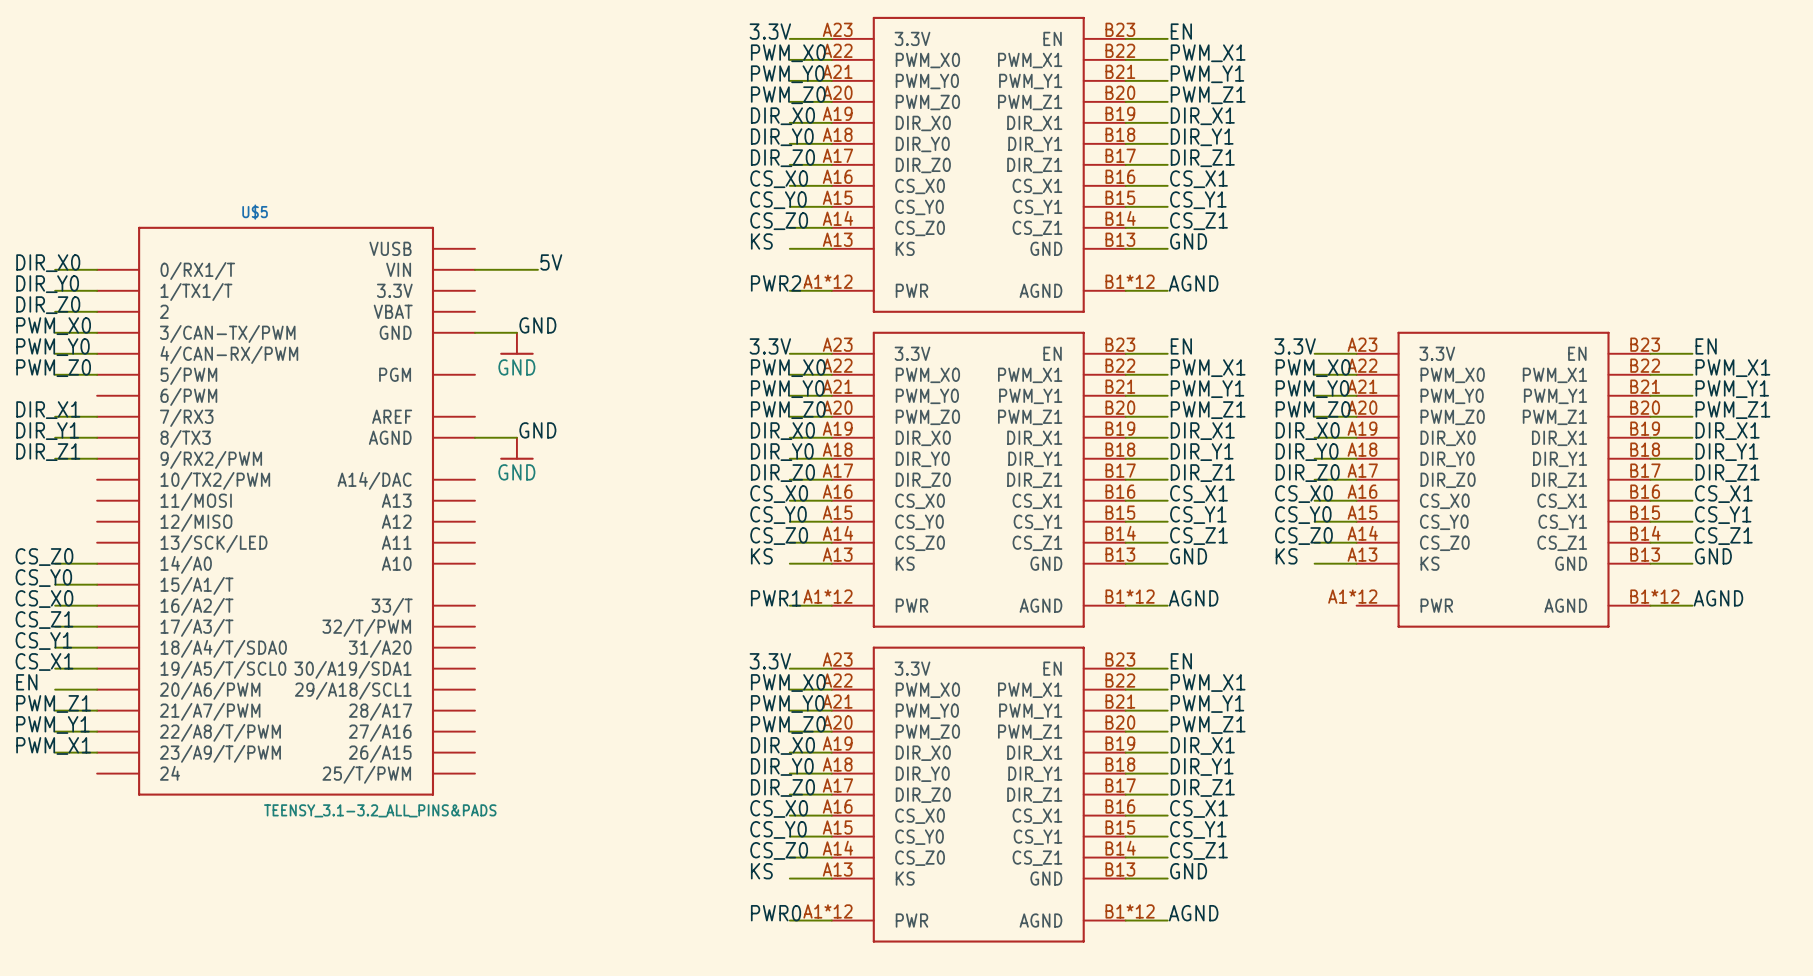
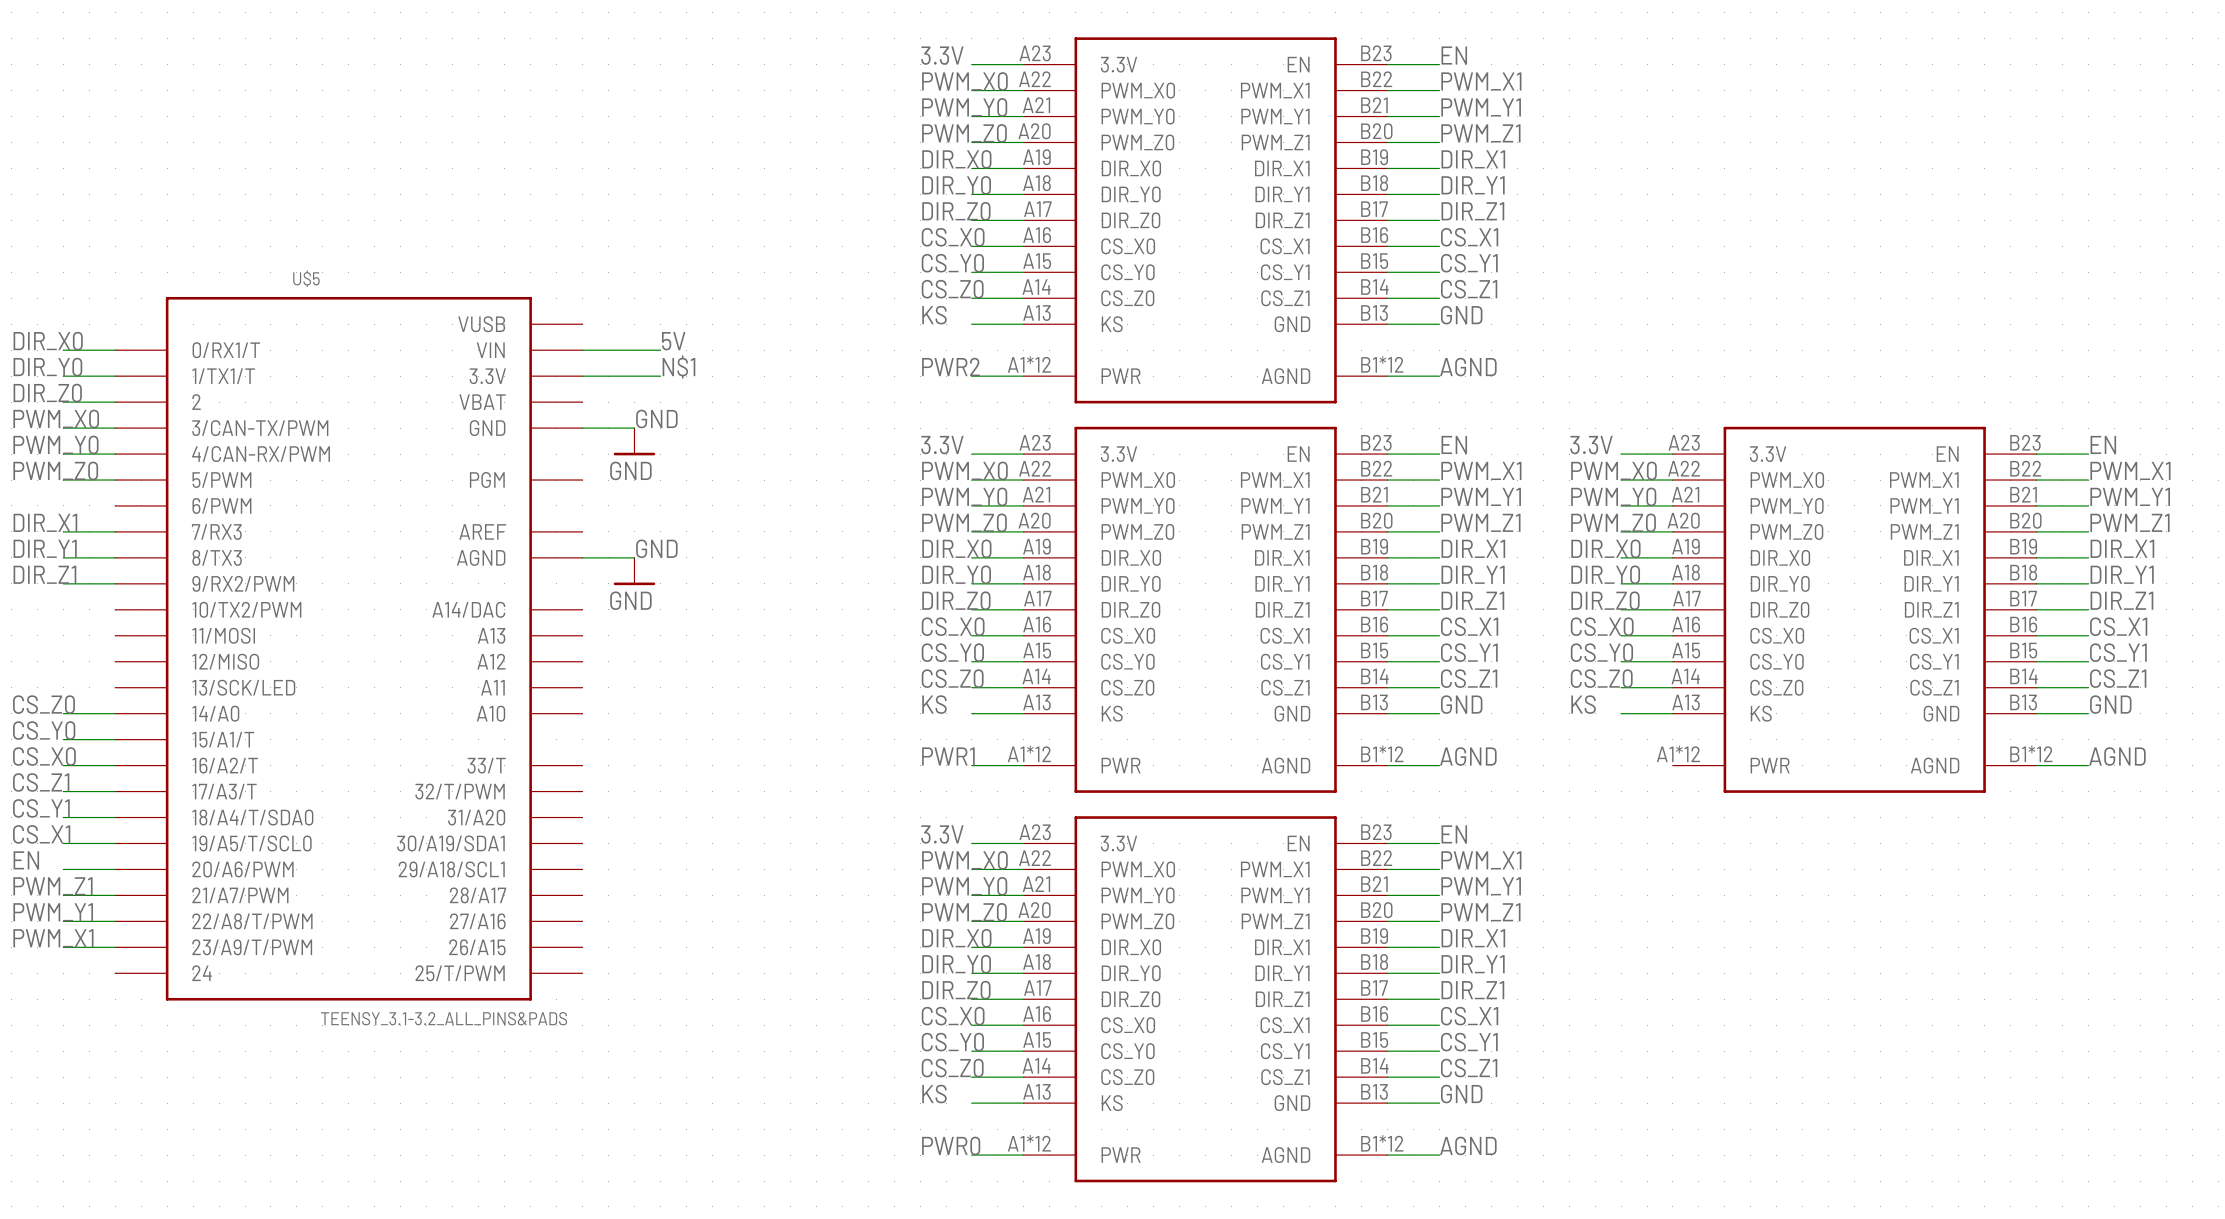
label: none -> N$1 (678, 366)
wire: none -> (582, 376) (660, 376)

